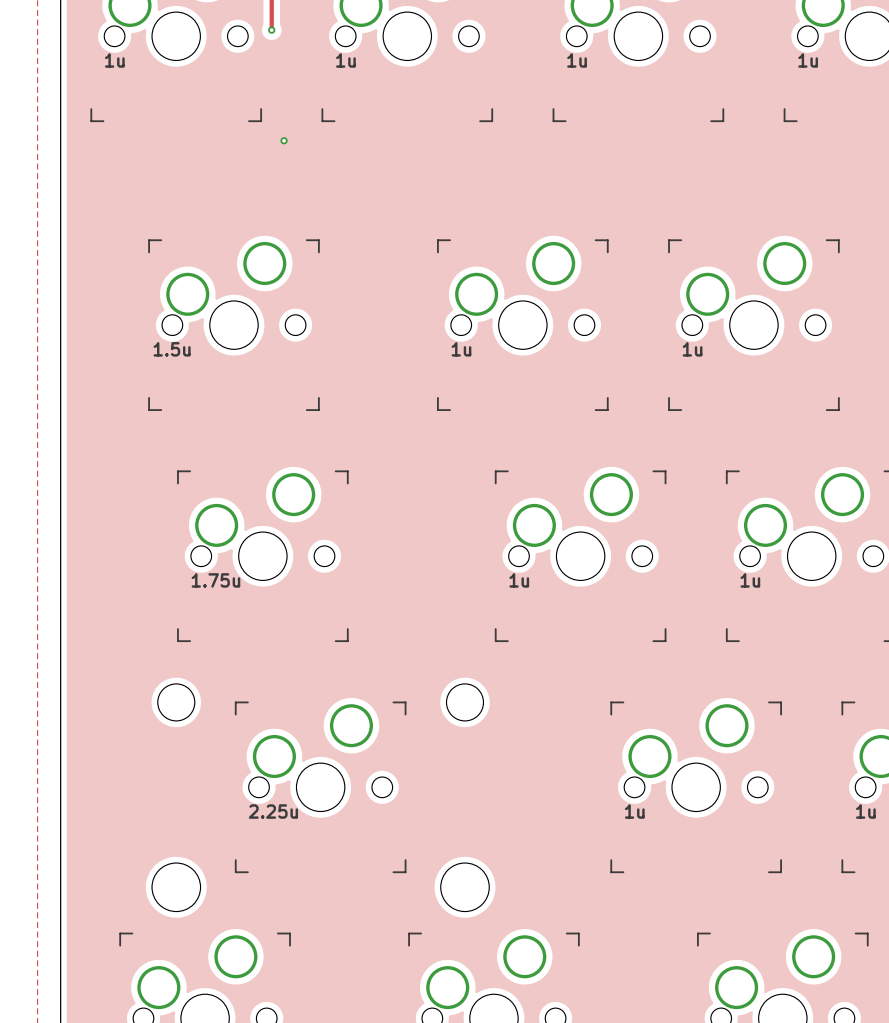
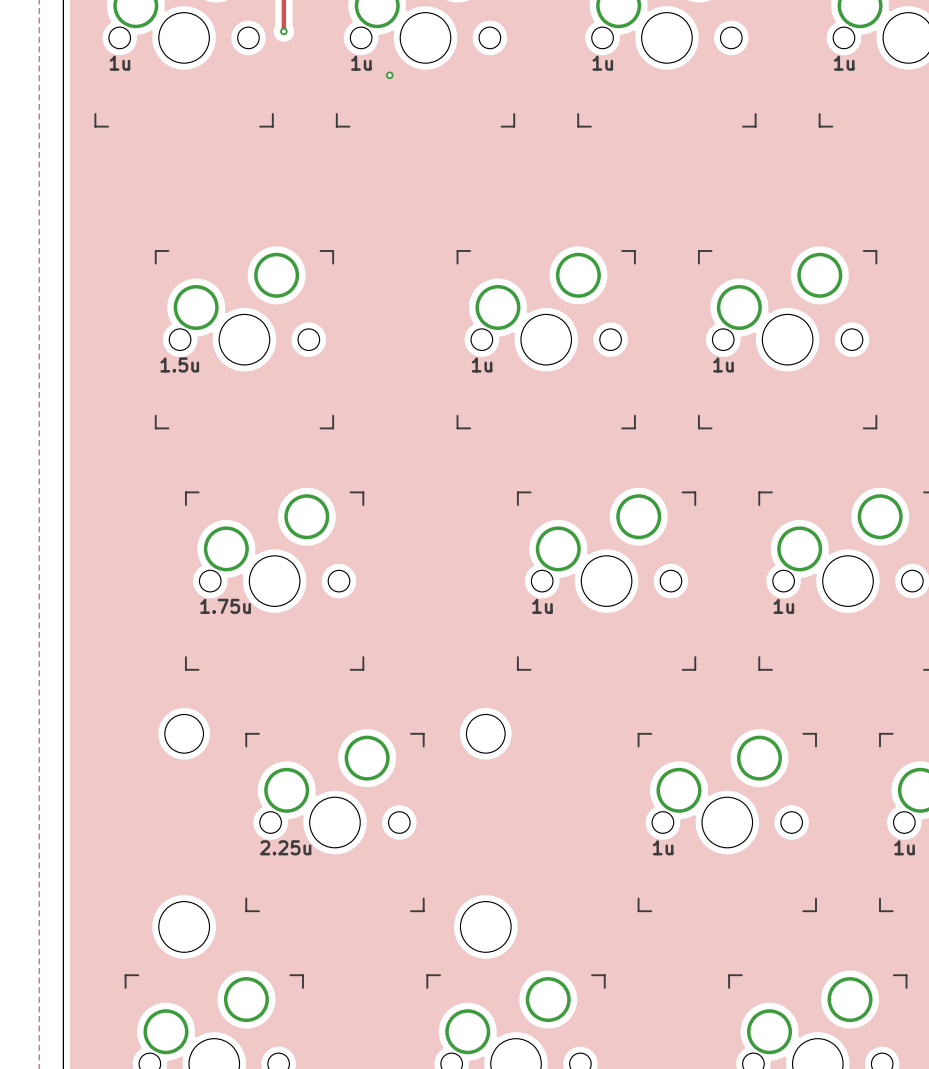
via: none -> (389, 75)
via: (284, 140) -> none

